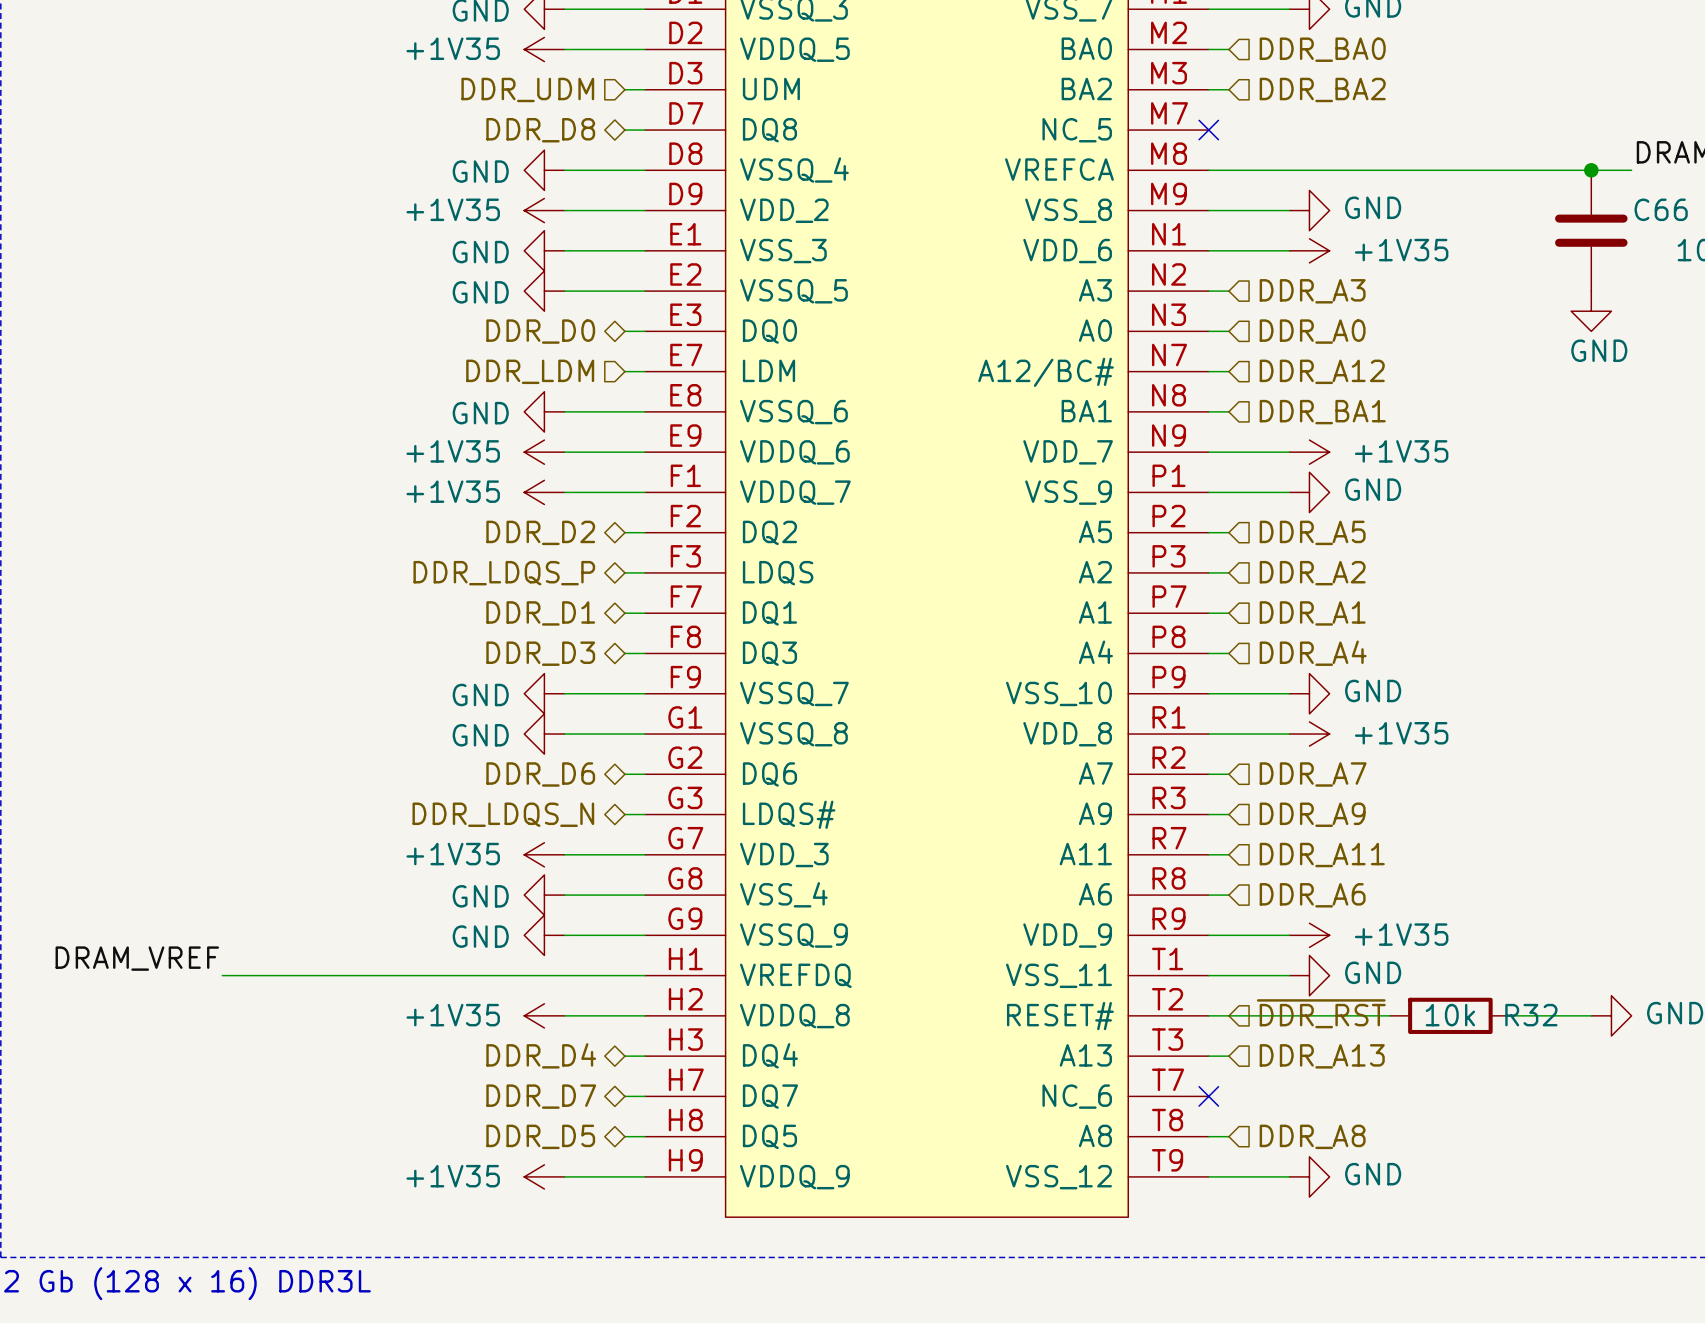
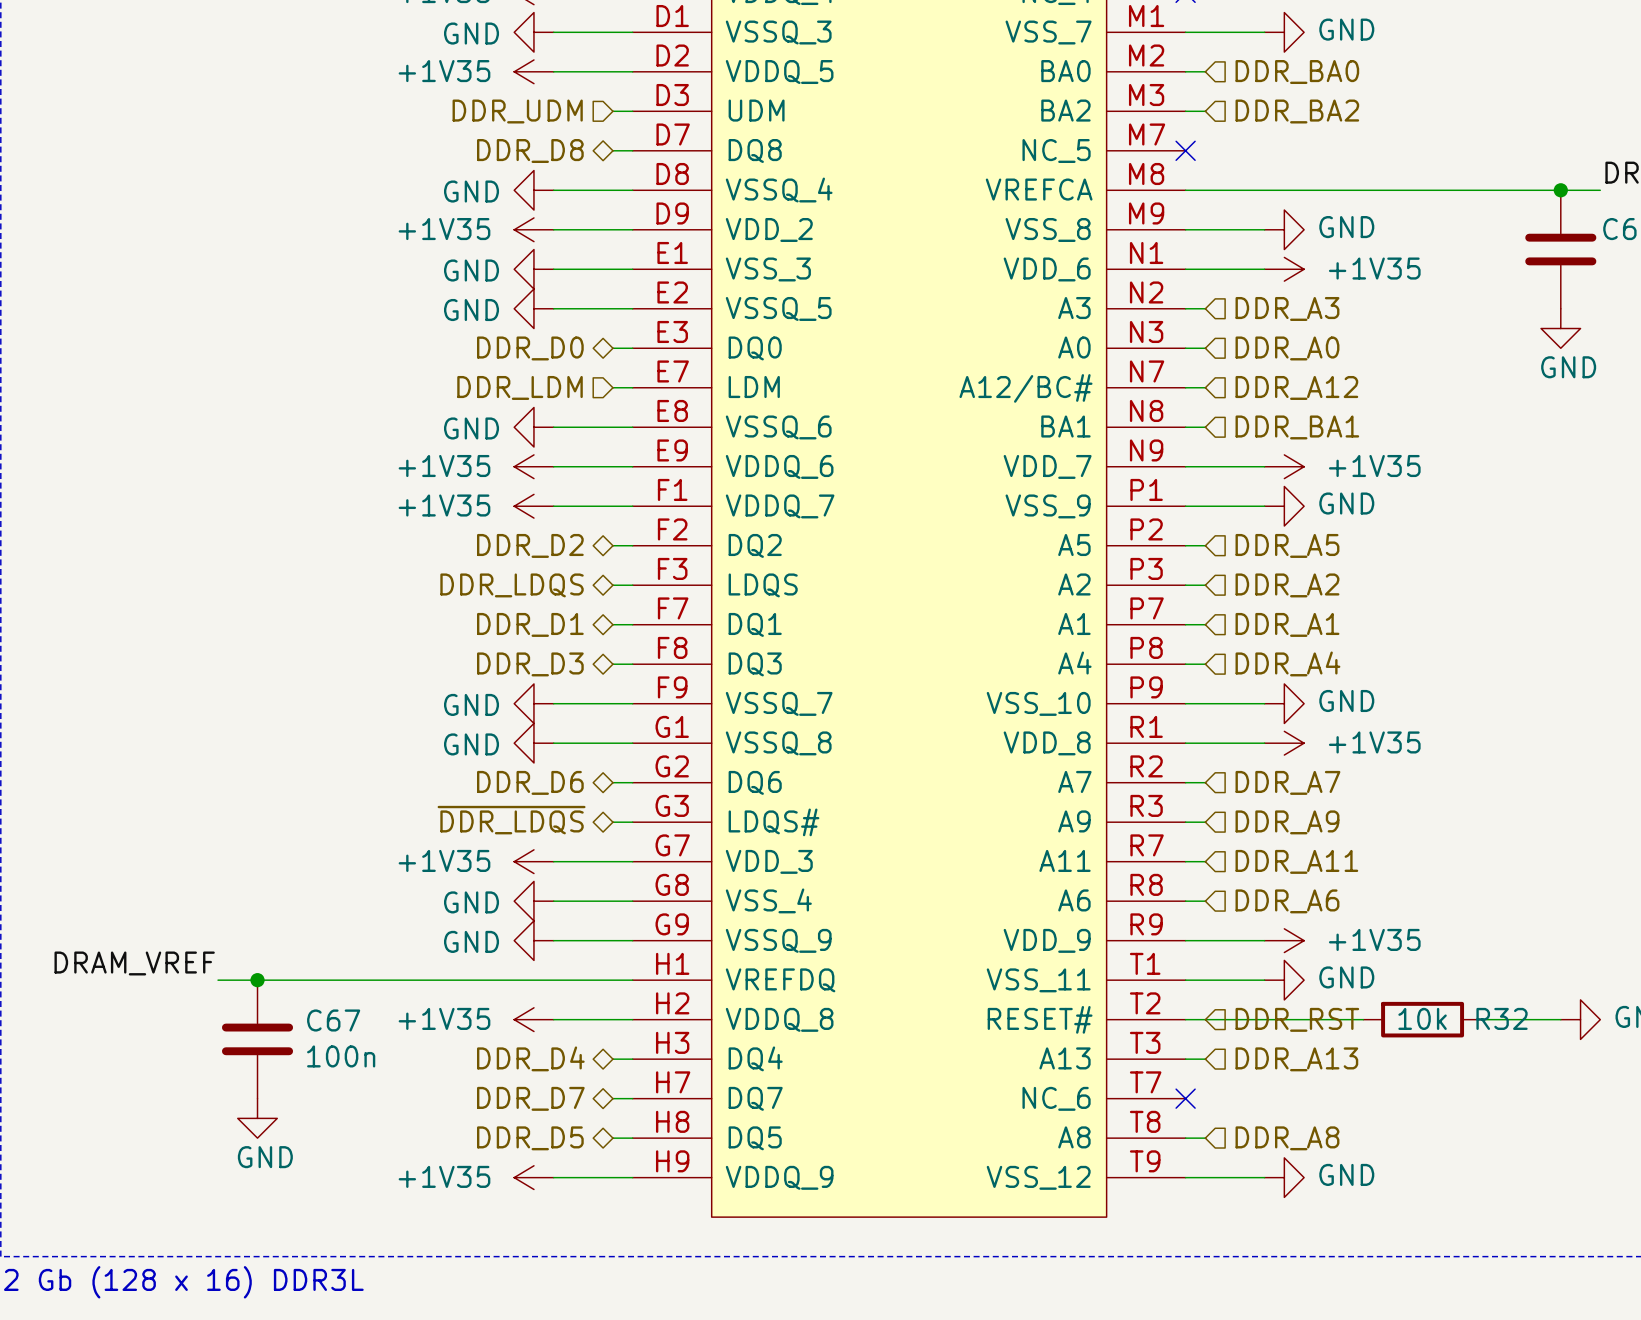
hierarchical label: DDR_LDQS_P (504, 573) -> DDR_LDQS (512, 585)
hierarchical label: DDR_LDQS_N (503, 814) -> ~{DDR_LDQS} (511, 820)
junction: none -> (257, 980)
hierarchical label: ~{DDR_RST} (1321, 1013) -> DDR_RST (1297, 1019)
C67: none -> 100n (257, 1039)
power symbol: none -> GND (257, 1118)

